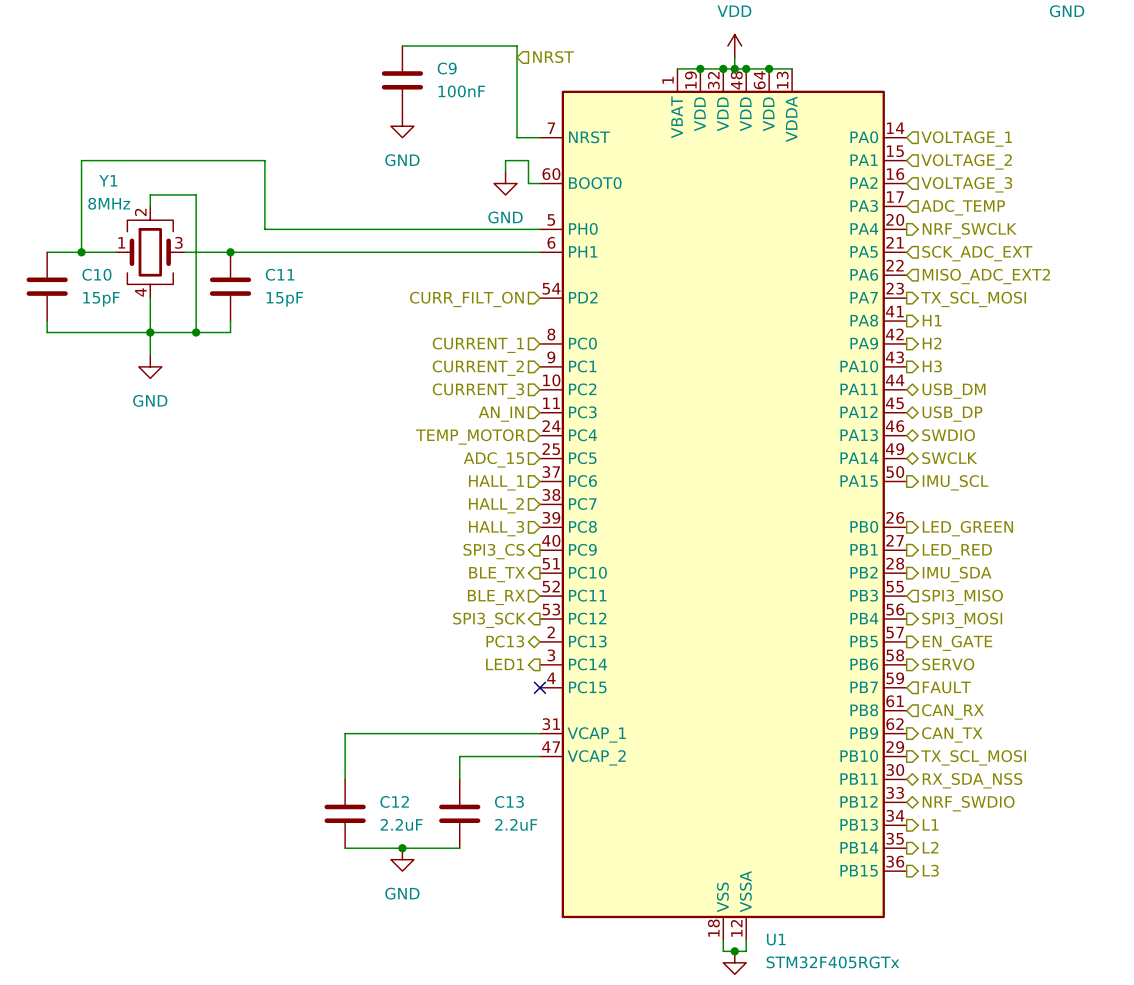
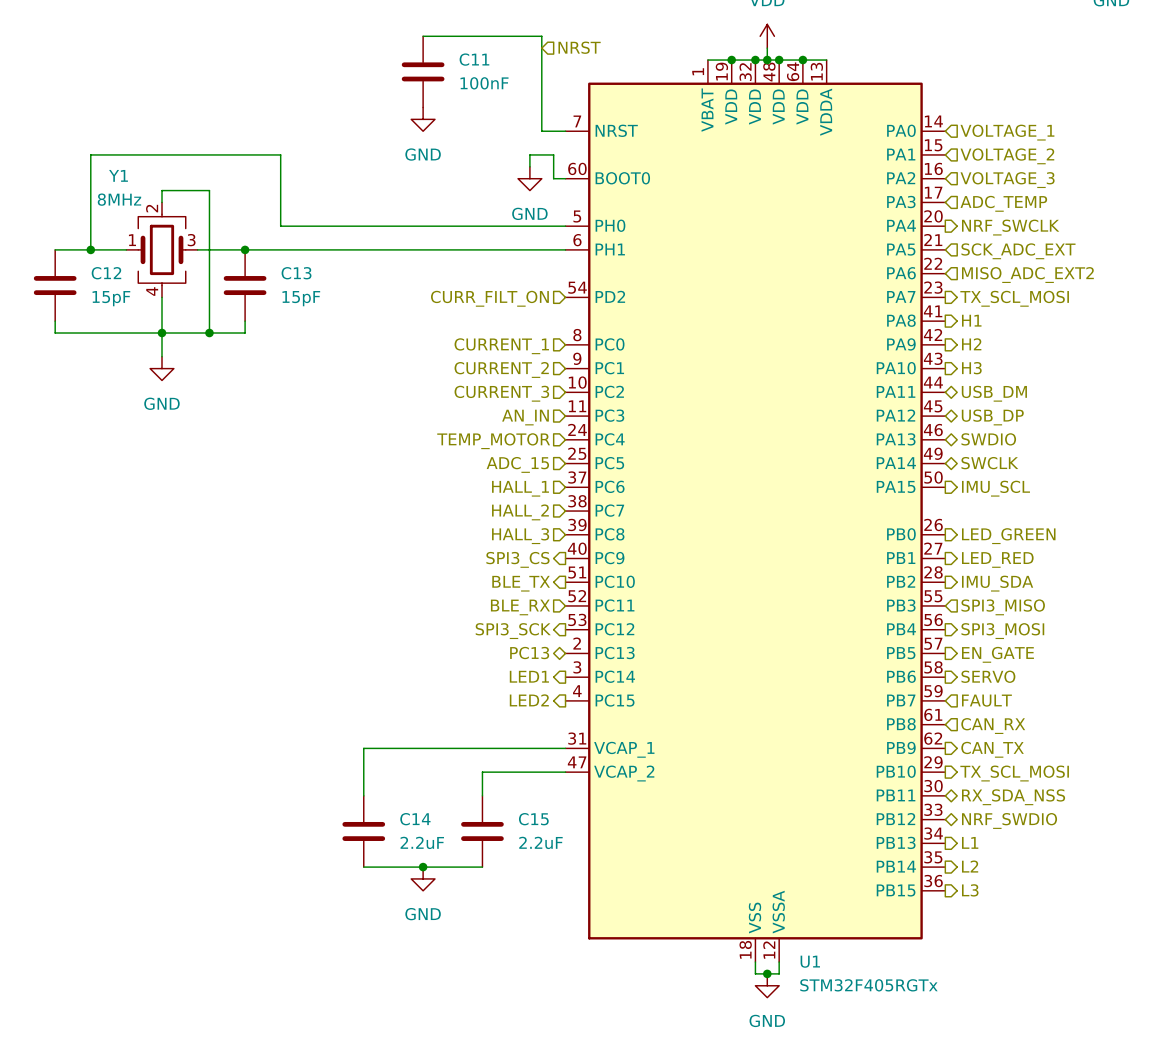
C9 name: C9 (447, 68) -> C11 (474, 59)
C10 name: C10 (96, 274) -> C12 (106, 273)
C11 name: C11 (280, 274) -> C13 (296, 273)
hierarchical label: none -> LED2 (529, 700)
no-connect mark: (539, 687) -> none
C12 name: C12 (394, 801) -> C14 (415, 819)
C13 name: C13 (509, 801) -> C15 (533, 819)

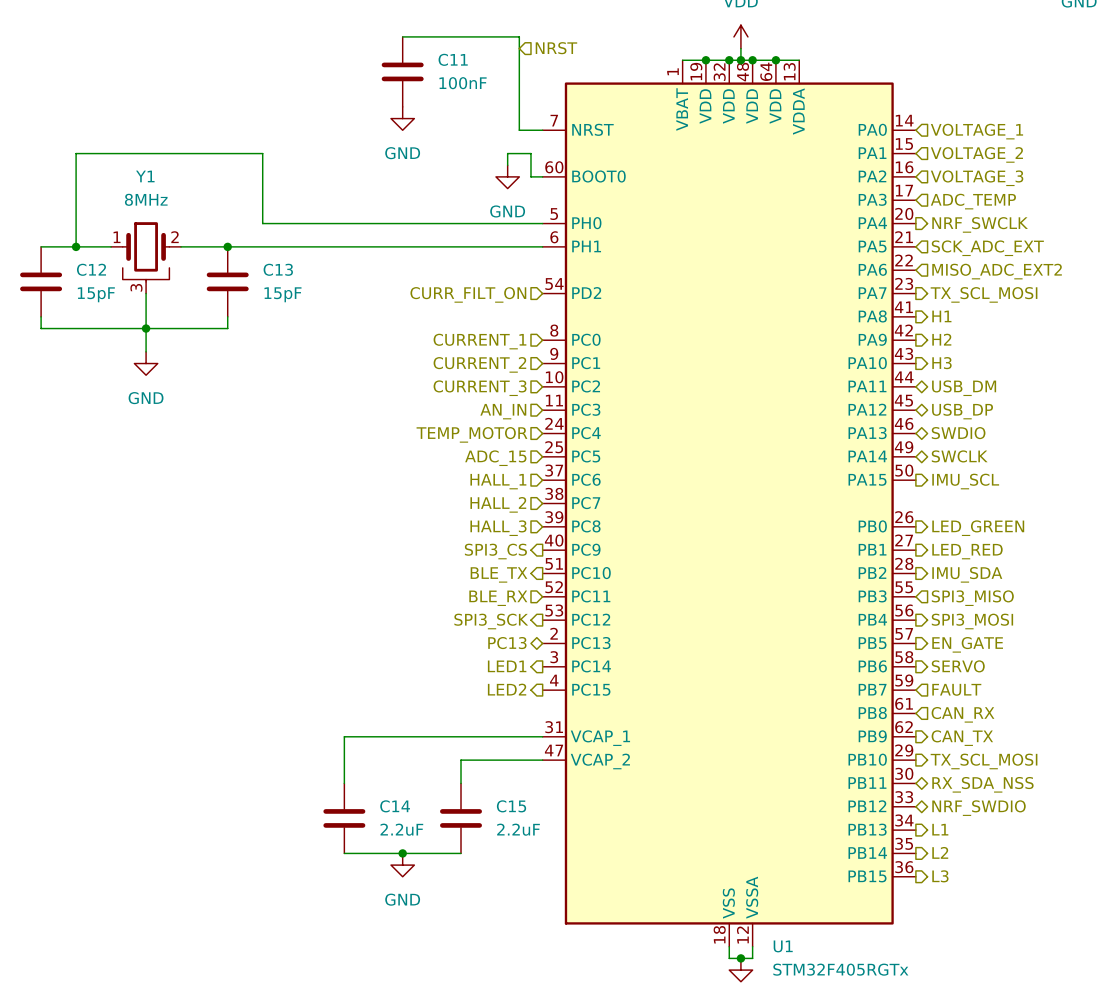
Y1 name position: Y1 (118, 175) -> Y1 (145, 176)
Y1 value position: 8MHz (119, 199) -> 8MHz (146, 199)
Y1 symbol: [126, 202, 198, 298] -> [111, 222, 182, 294]
wire: (162, 202) (162, 190) (209, 190) (209, 333) -> none
junction: (209, 333) -> none

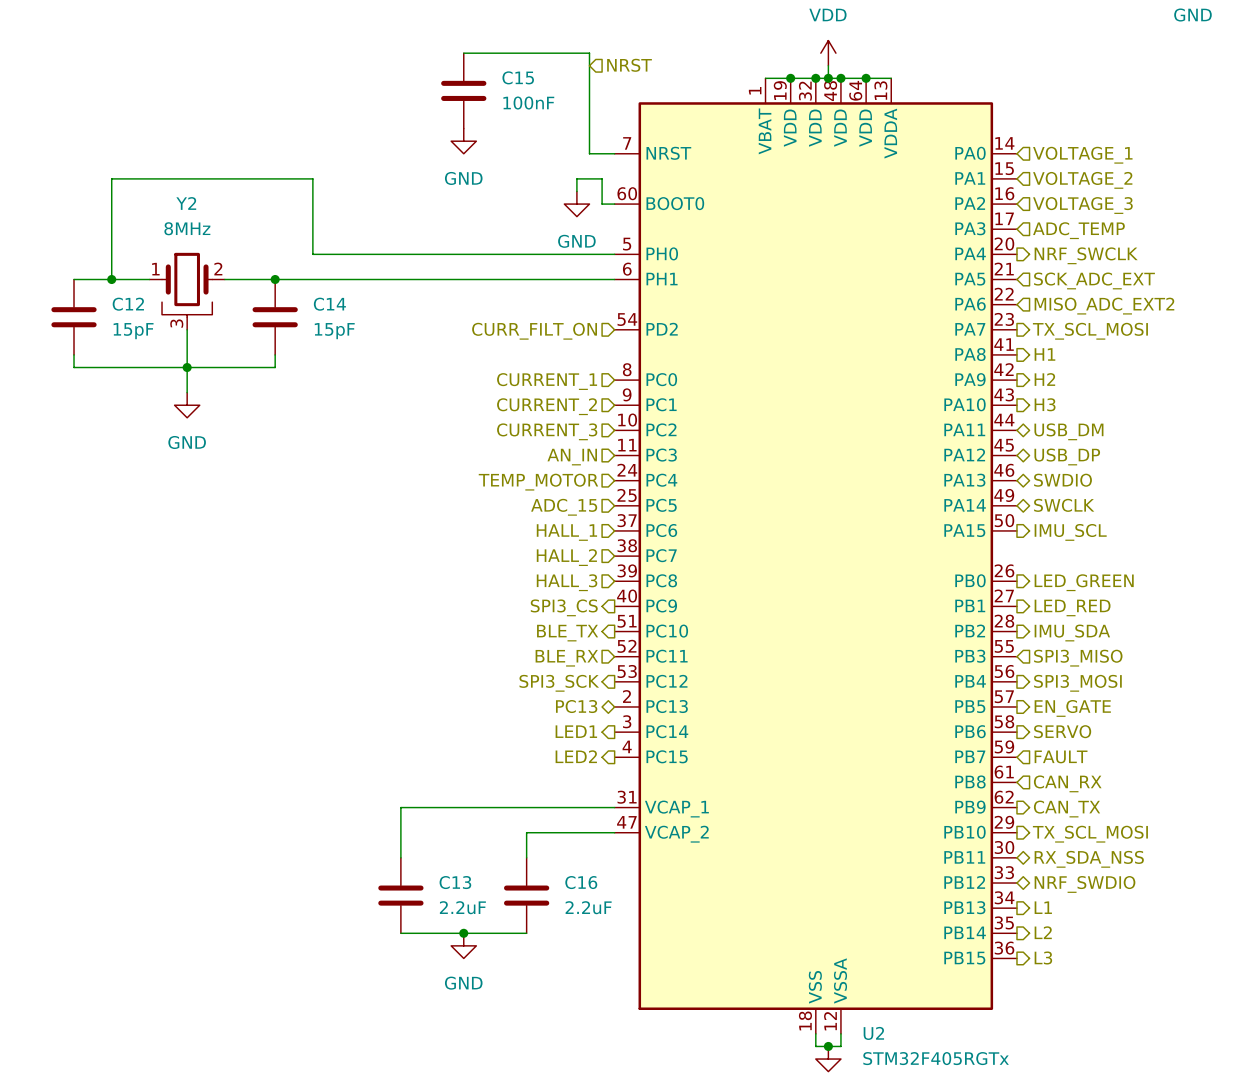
C11 name: C11 (453, 59) -> C15 (518, 77)
Y1 name: Y1 (145, 176) -> Y2 (186, 203)
C13 name: C13 (278, 269) -> C14 (329, 304)
C14 name: C14 (395, 806) -> C13 (455, 882)
C15 name: C15 (511, 806) -> C16 (581, 882)
U1 name: U1 (783, 946) -> U2 (873, 1033)

